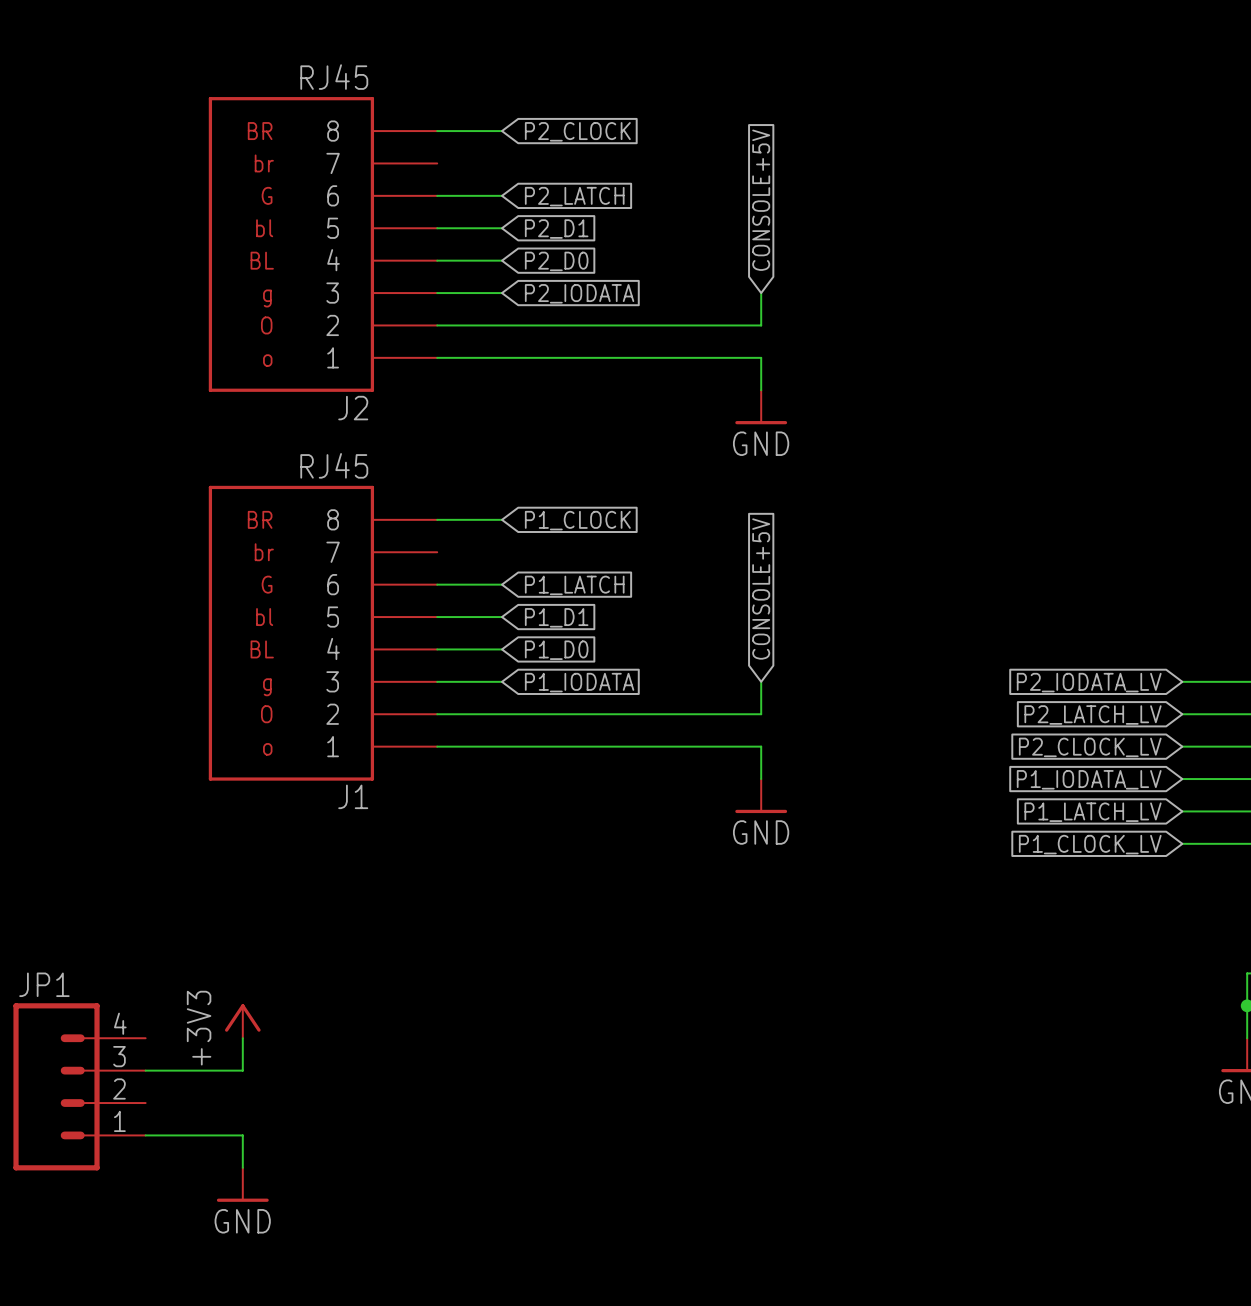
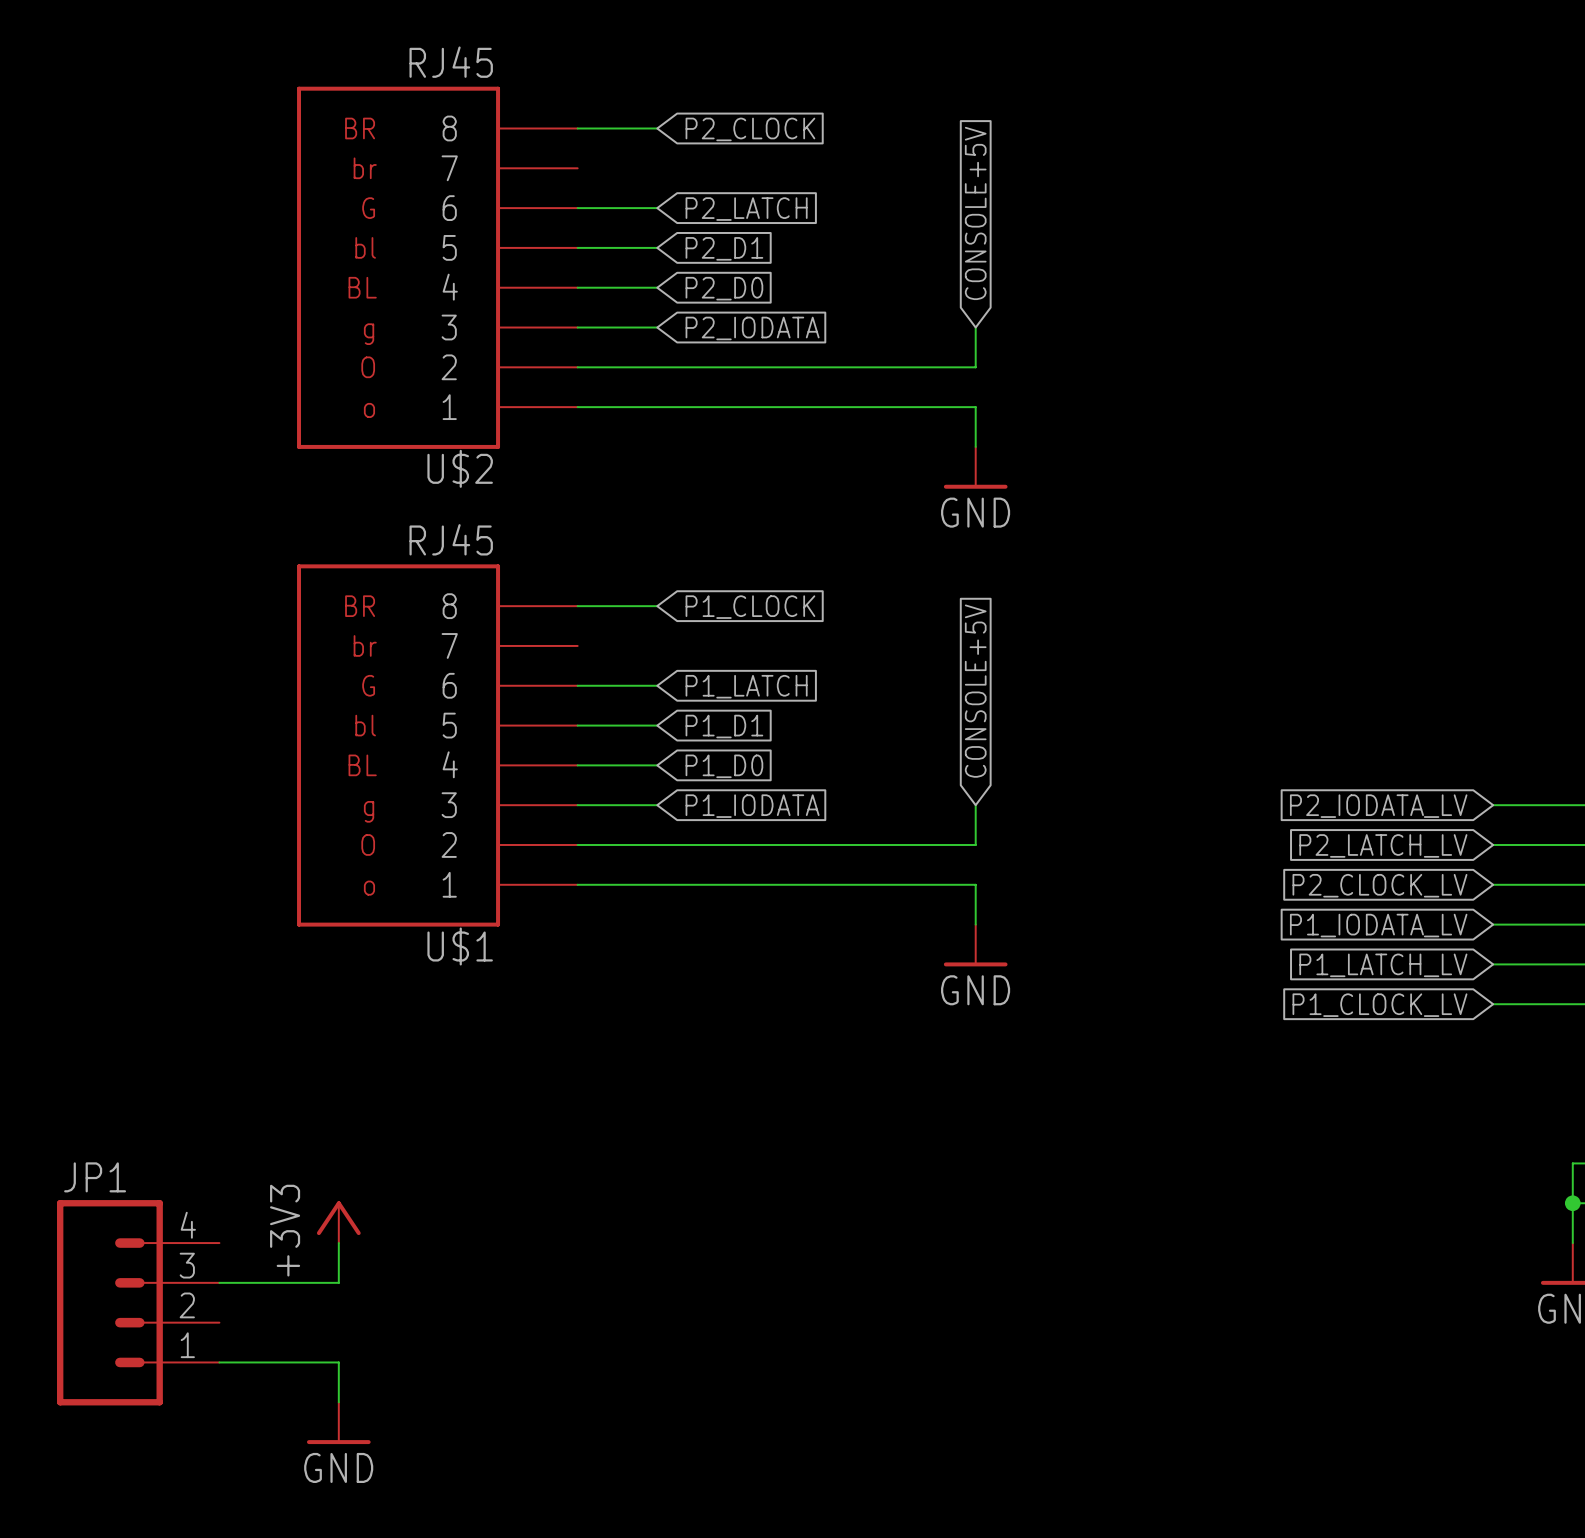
J2 name: J2 (353, 408) -> U$2 (460, 468)
J1 name: J1 (353, 796) -> U$1 (460, 946)

